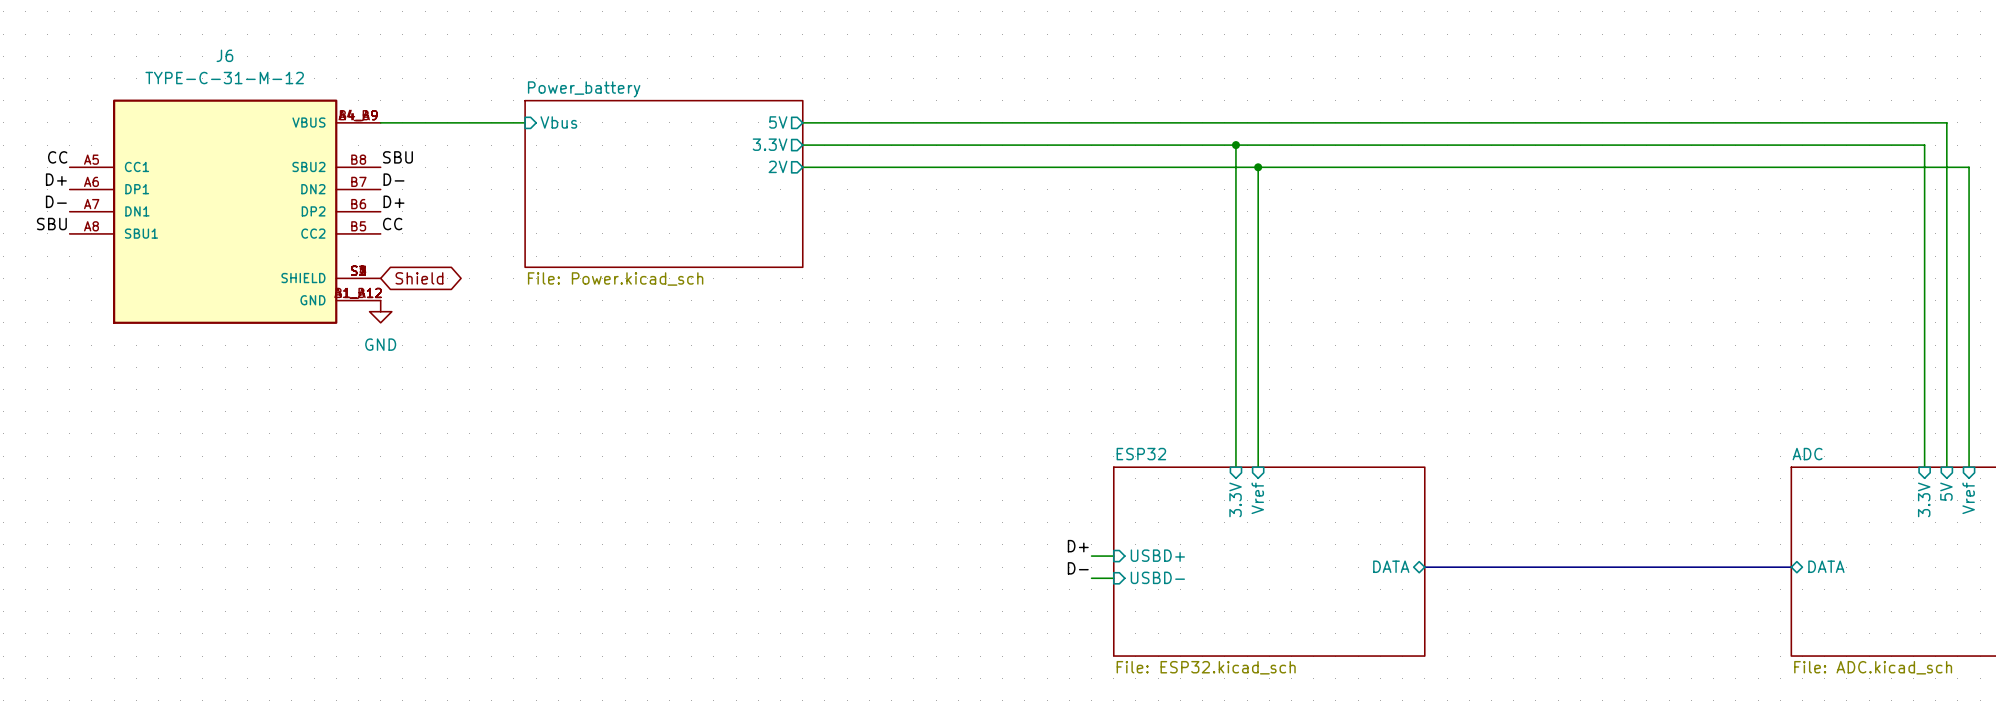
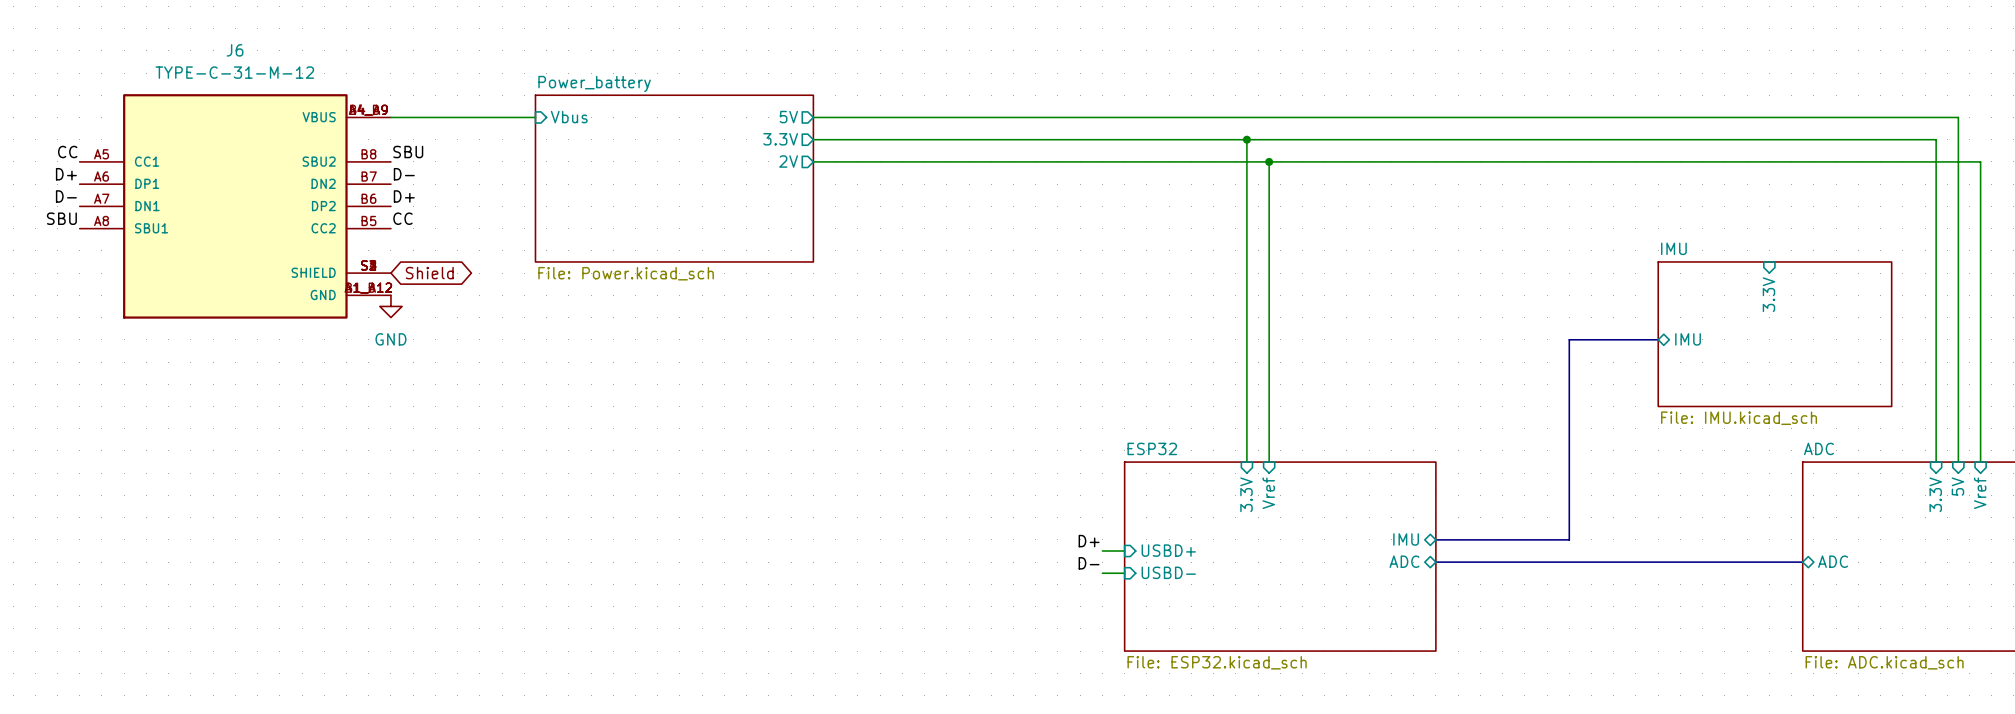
sheet pin: none -> 3.3V (1768, 294)
sheet IMU: none -> File: IMU.kicad_sch (1774, 334)
sheet pin: none -> IMU (1688, 339)
bus: none -> (1658, 339) (1569, 339) (1569, 539) (1435, 539)
sheet pin: none -> IMU (1406, 539)
sheet pin: DATA (1391, 566) -> ADC (1404, 561)
sheet pin: DATA (1826, 566) -> ADC (1833, 561)

